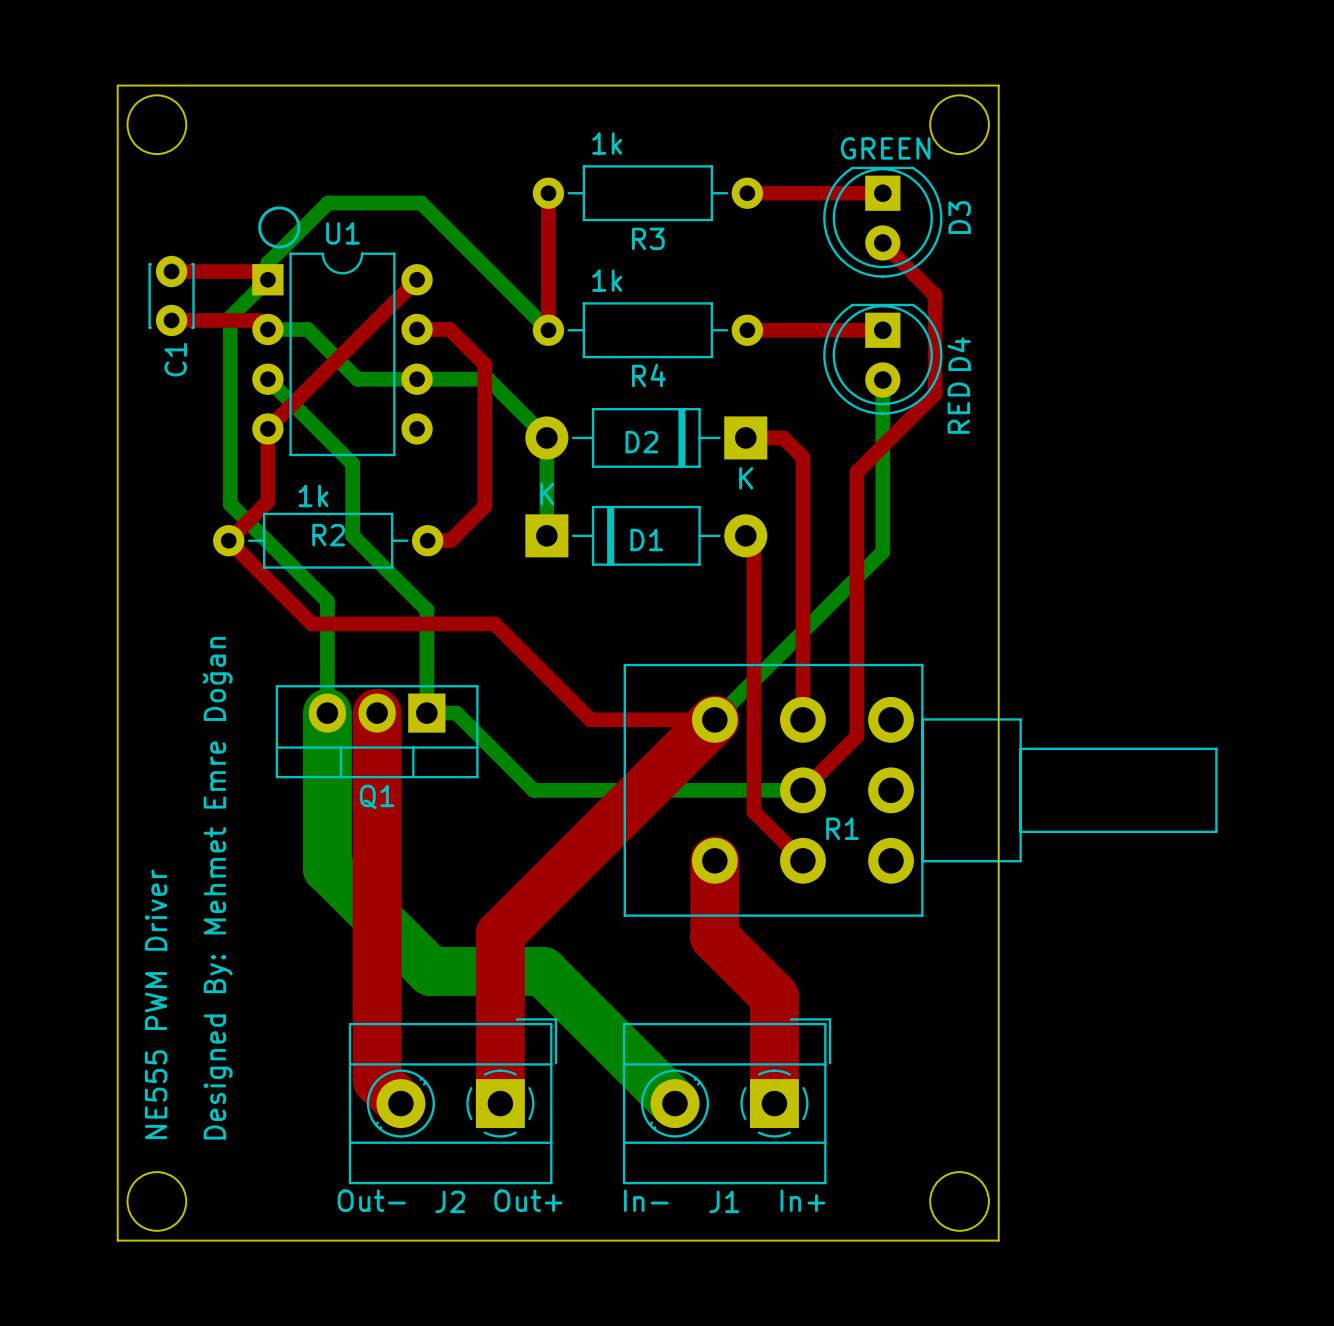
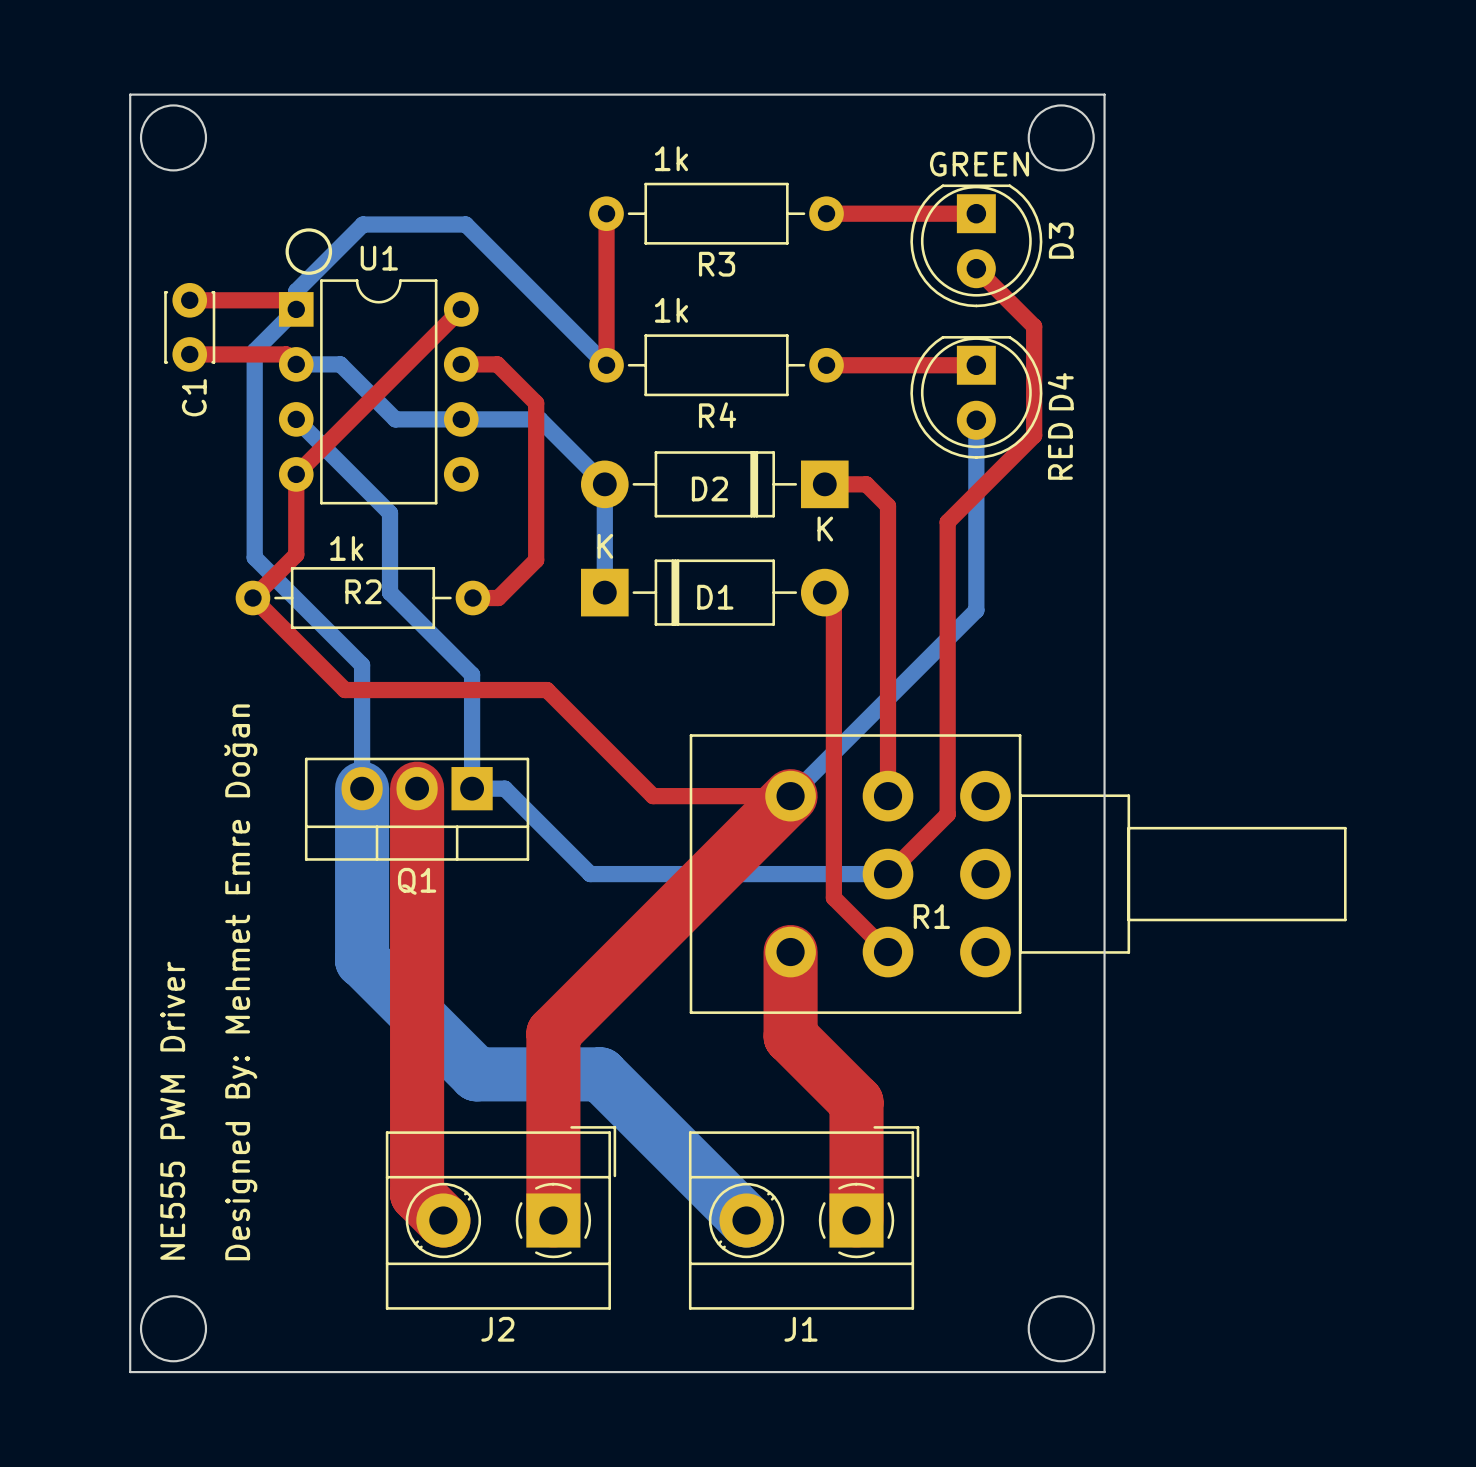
text: Out- (371, 1200) -> none
text: Out+ (528, 1200) -> none
text: In- (646, 1200) -> none
text: In+ (802, 1200) -> none

